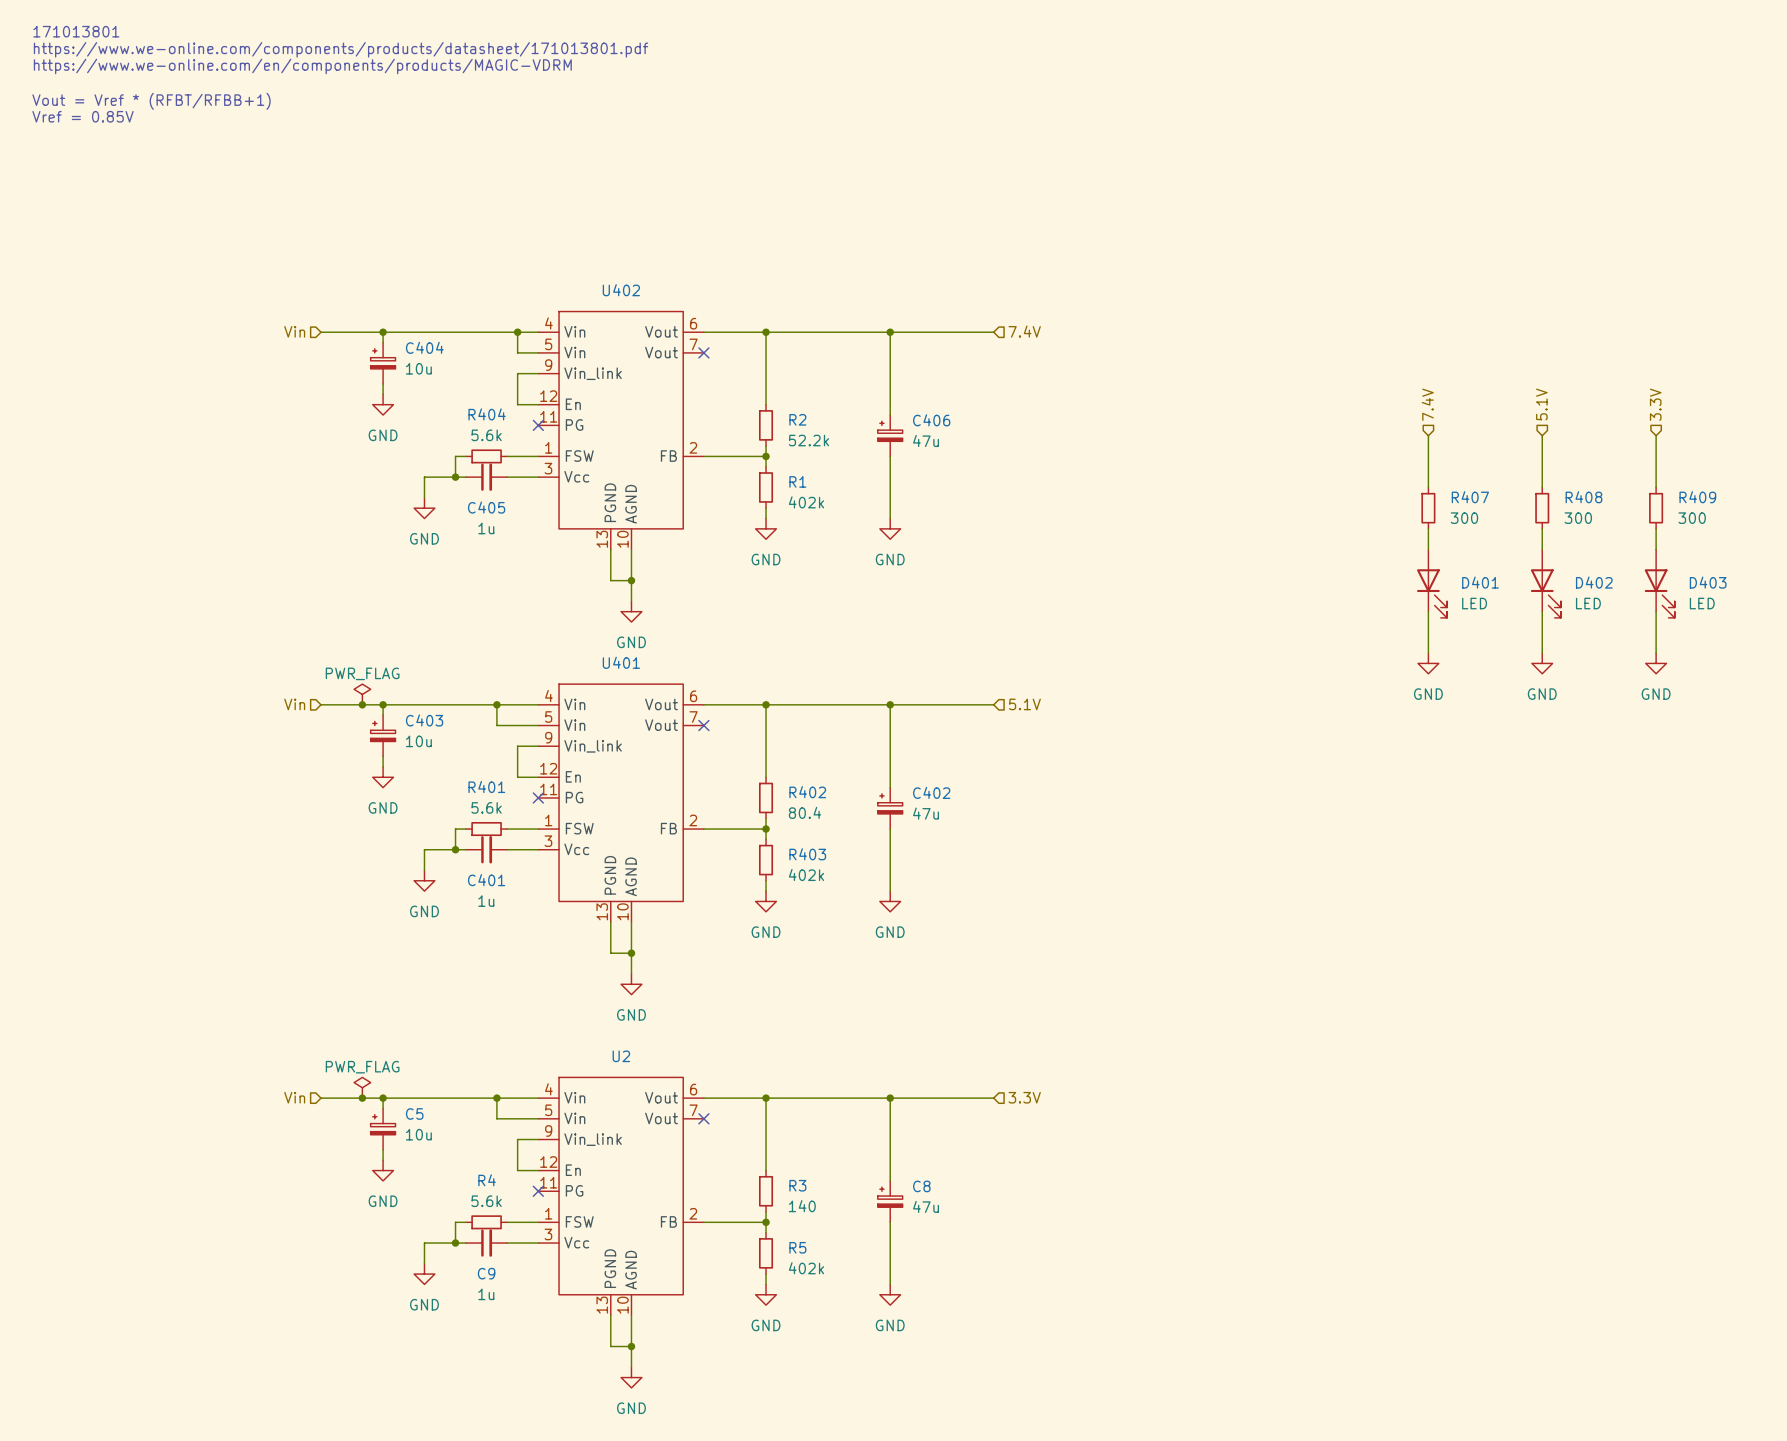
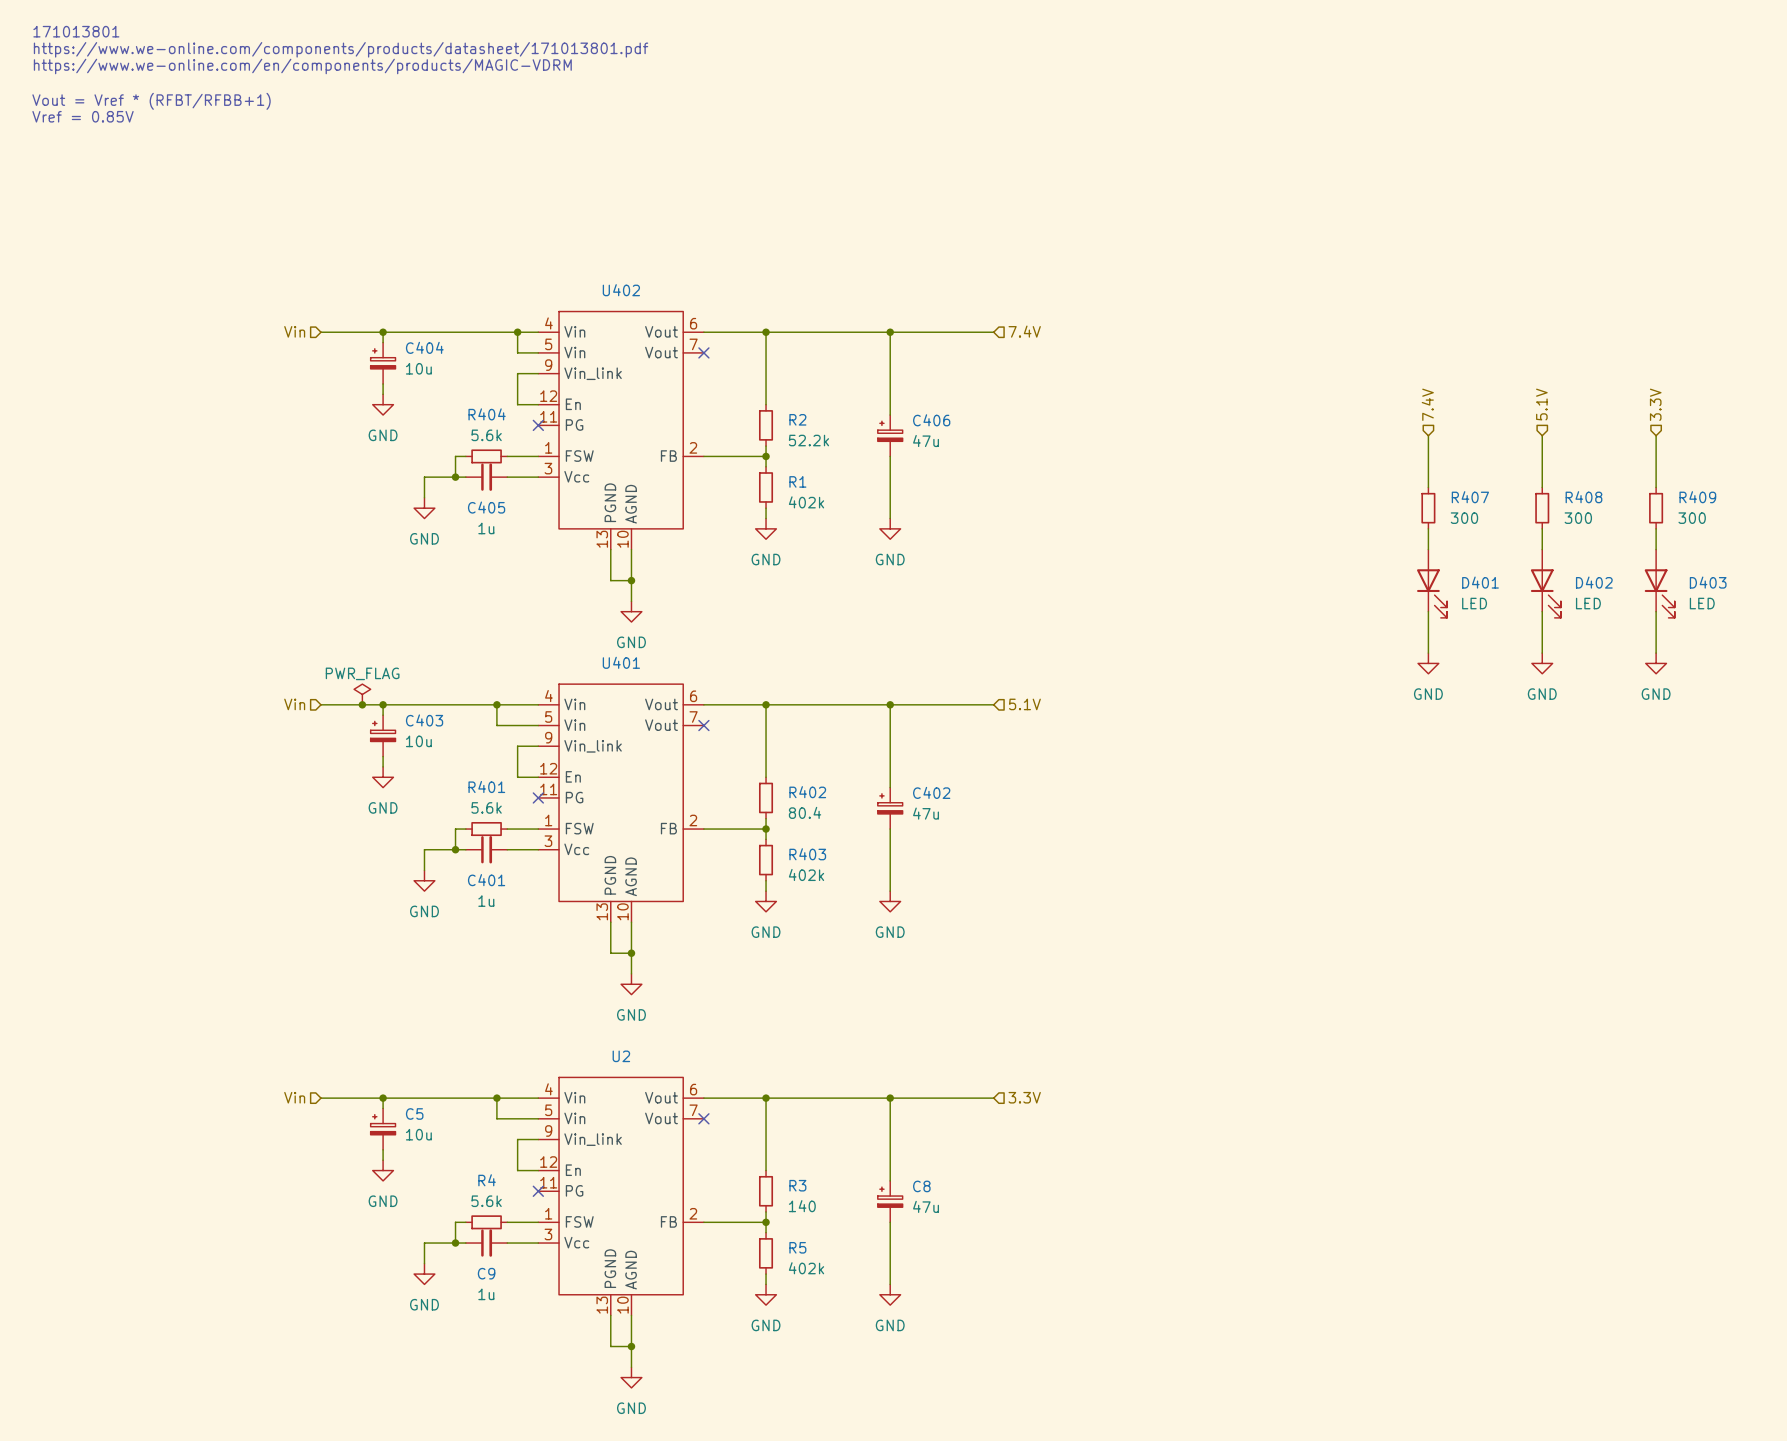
power symbol: PWR_FLAG (362, 1087) -> none
junction: (362, 1098) -> none

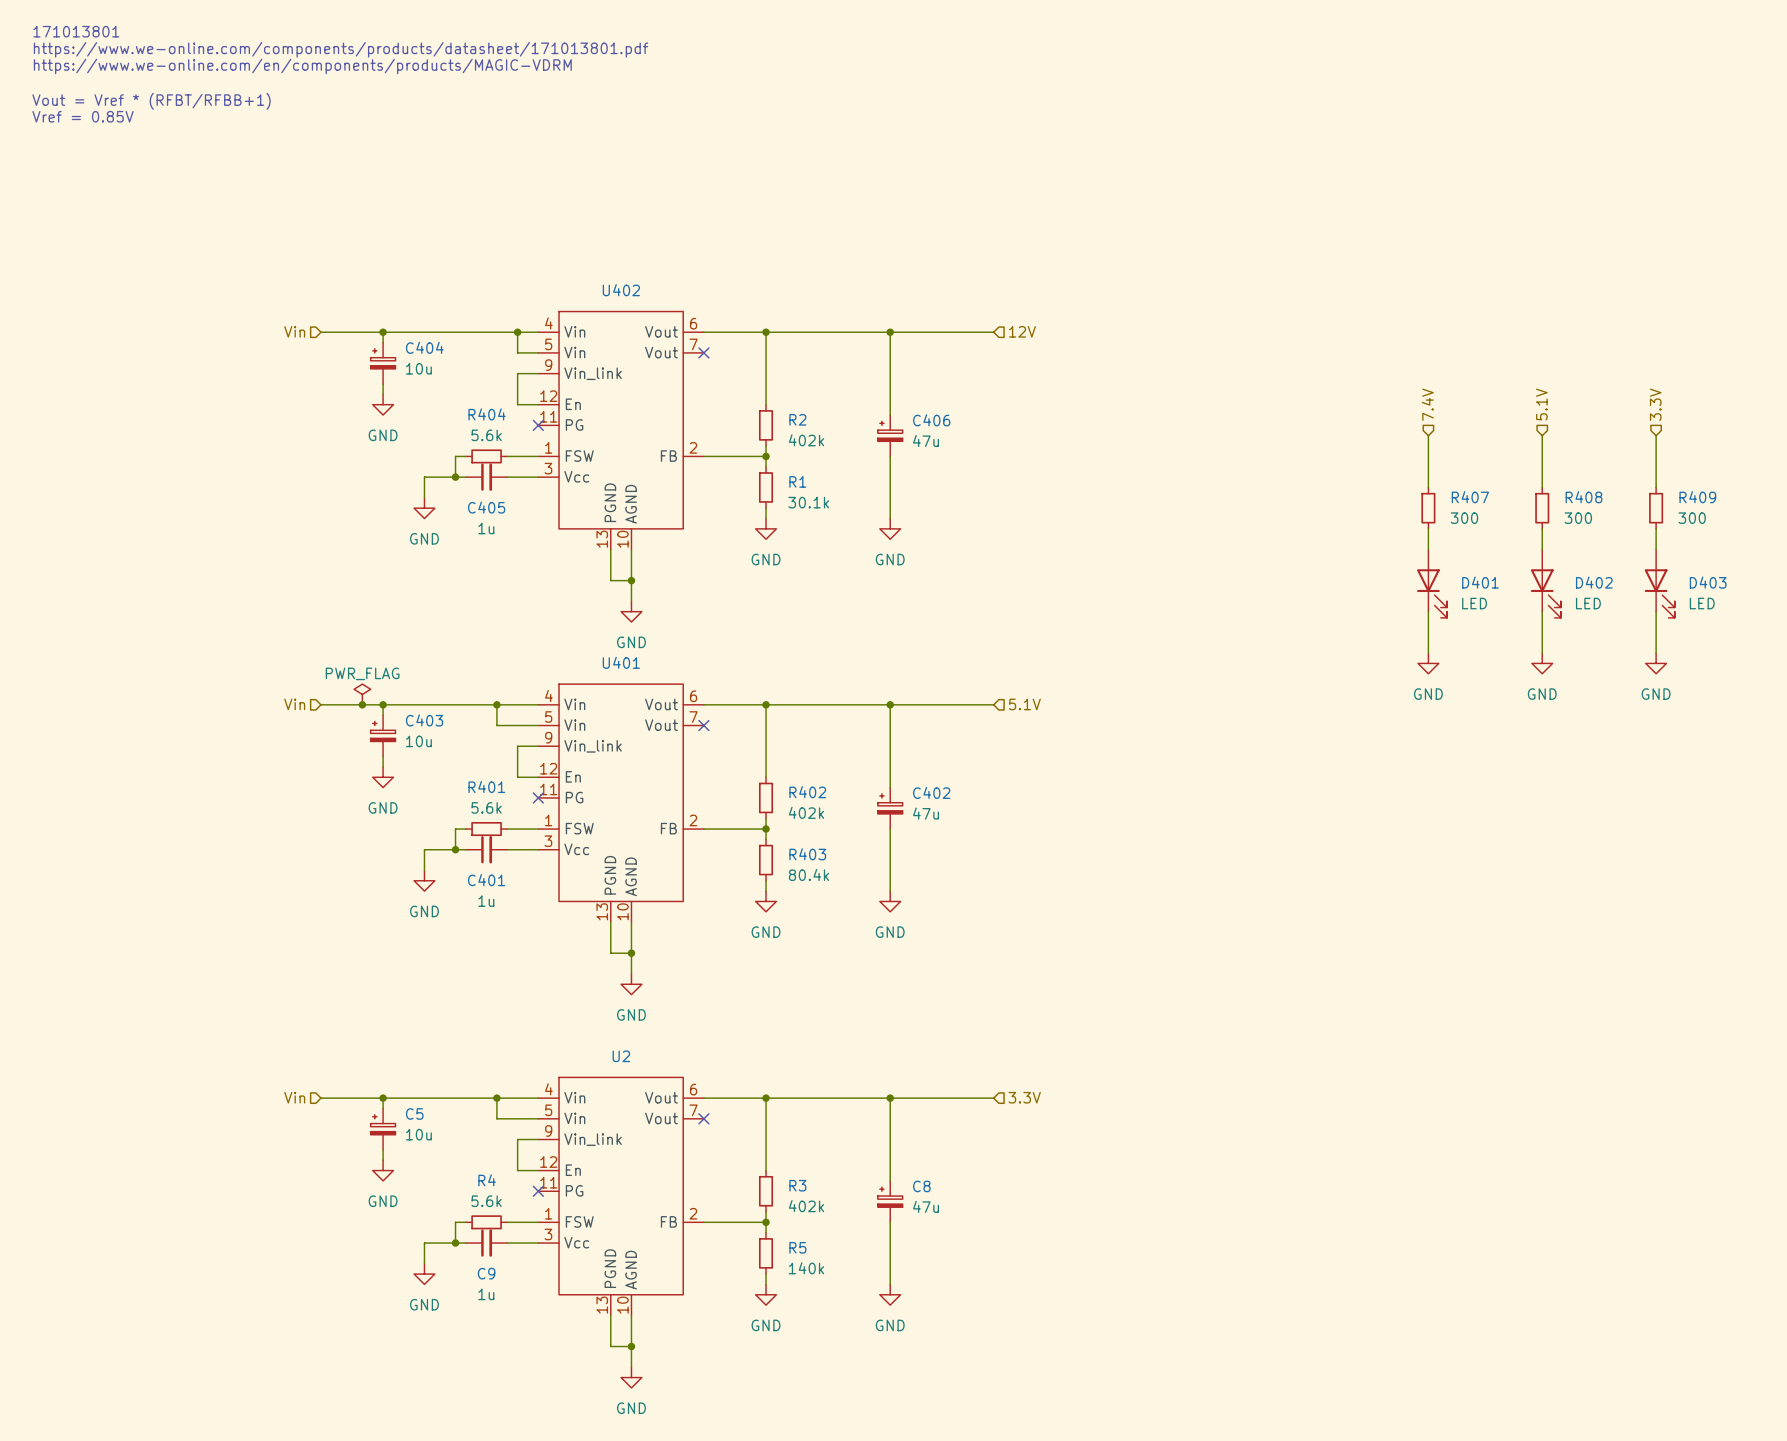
hierarchical label: 7.4V (1024, 331) -> 12V (1022, 331)
R2 value: 52.2k (808, 440) -> 402k (806, 440)
R1 value: 402k (806, 502) -> 30.1k (808, 502)
R402 value: 80.4 (805, 812) -> 402k (806, 812)
R403 value: 402k (806, 874) -> 80.4k (808, 874)
R3 value: 140 (802, 1206) -> 402k (806, 1206)
R5 value: 402k (806, 1268) -> 140k (806, 1268)

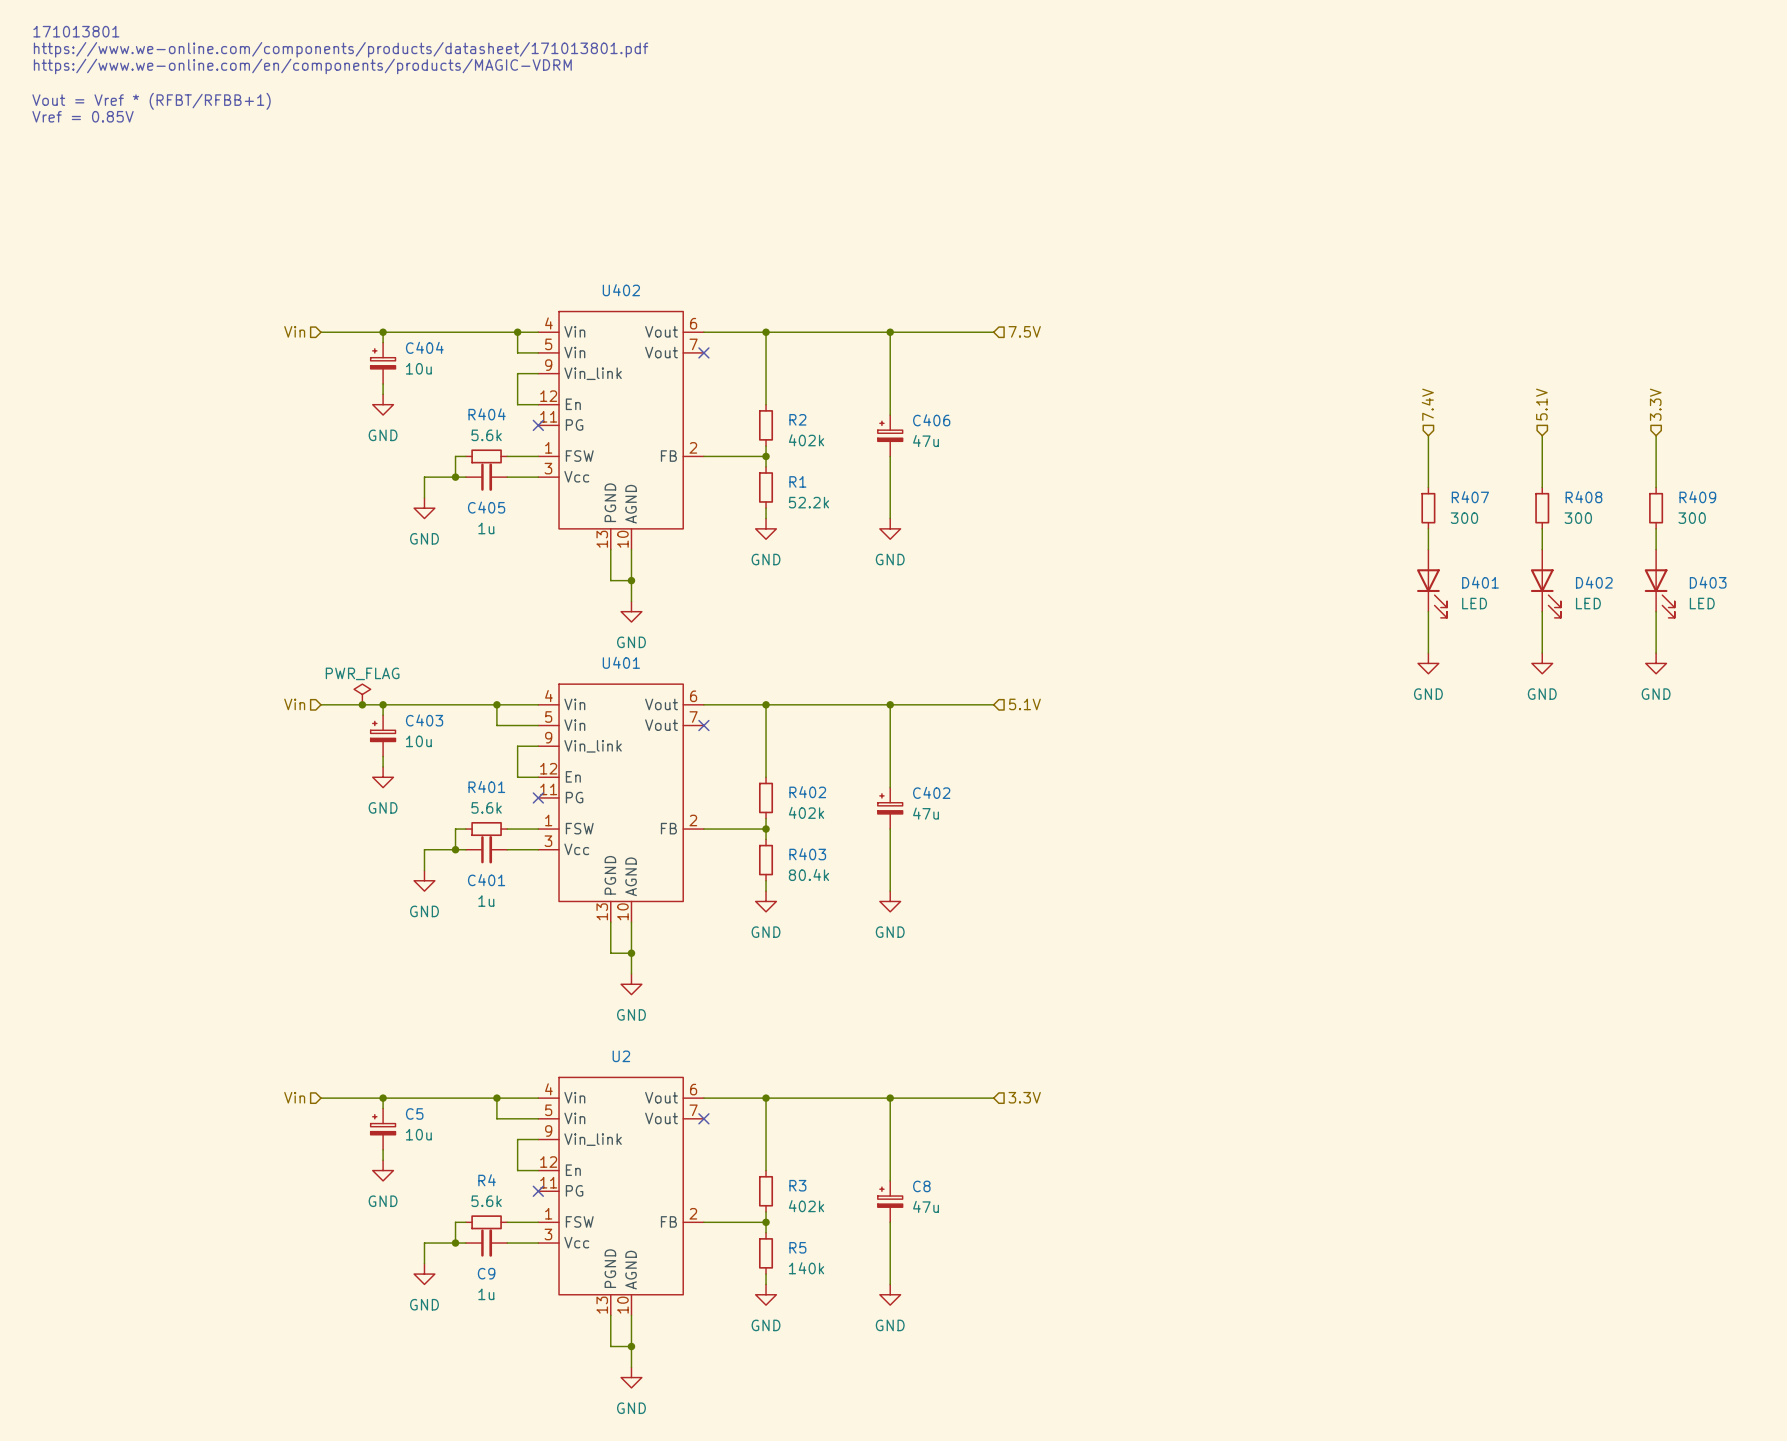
hierarchical label: 12V (1022, 331) -> 7.5V (1024, 331)
R1 value: 30.1k (808, 502) -> 52.2k (808, 502)

